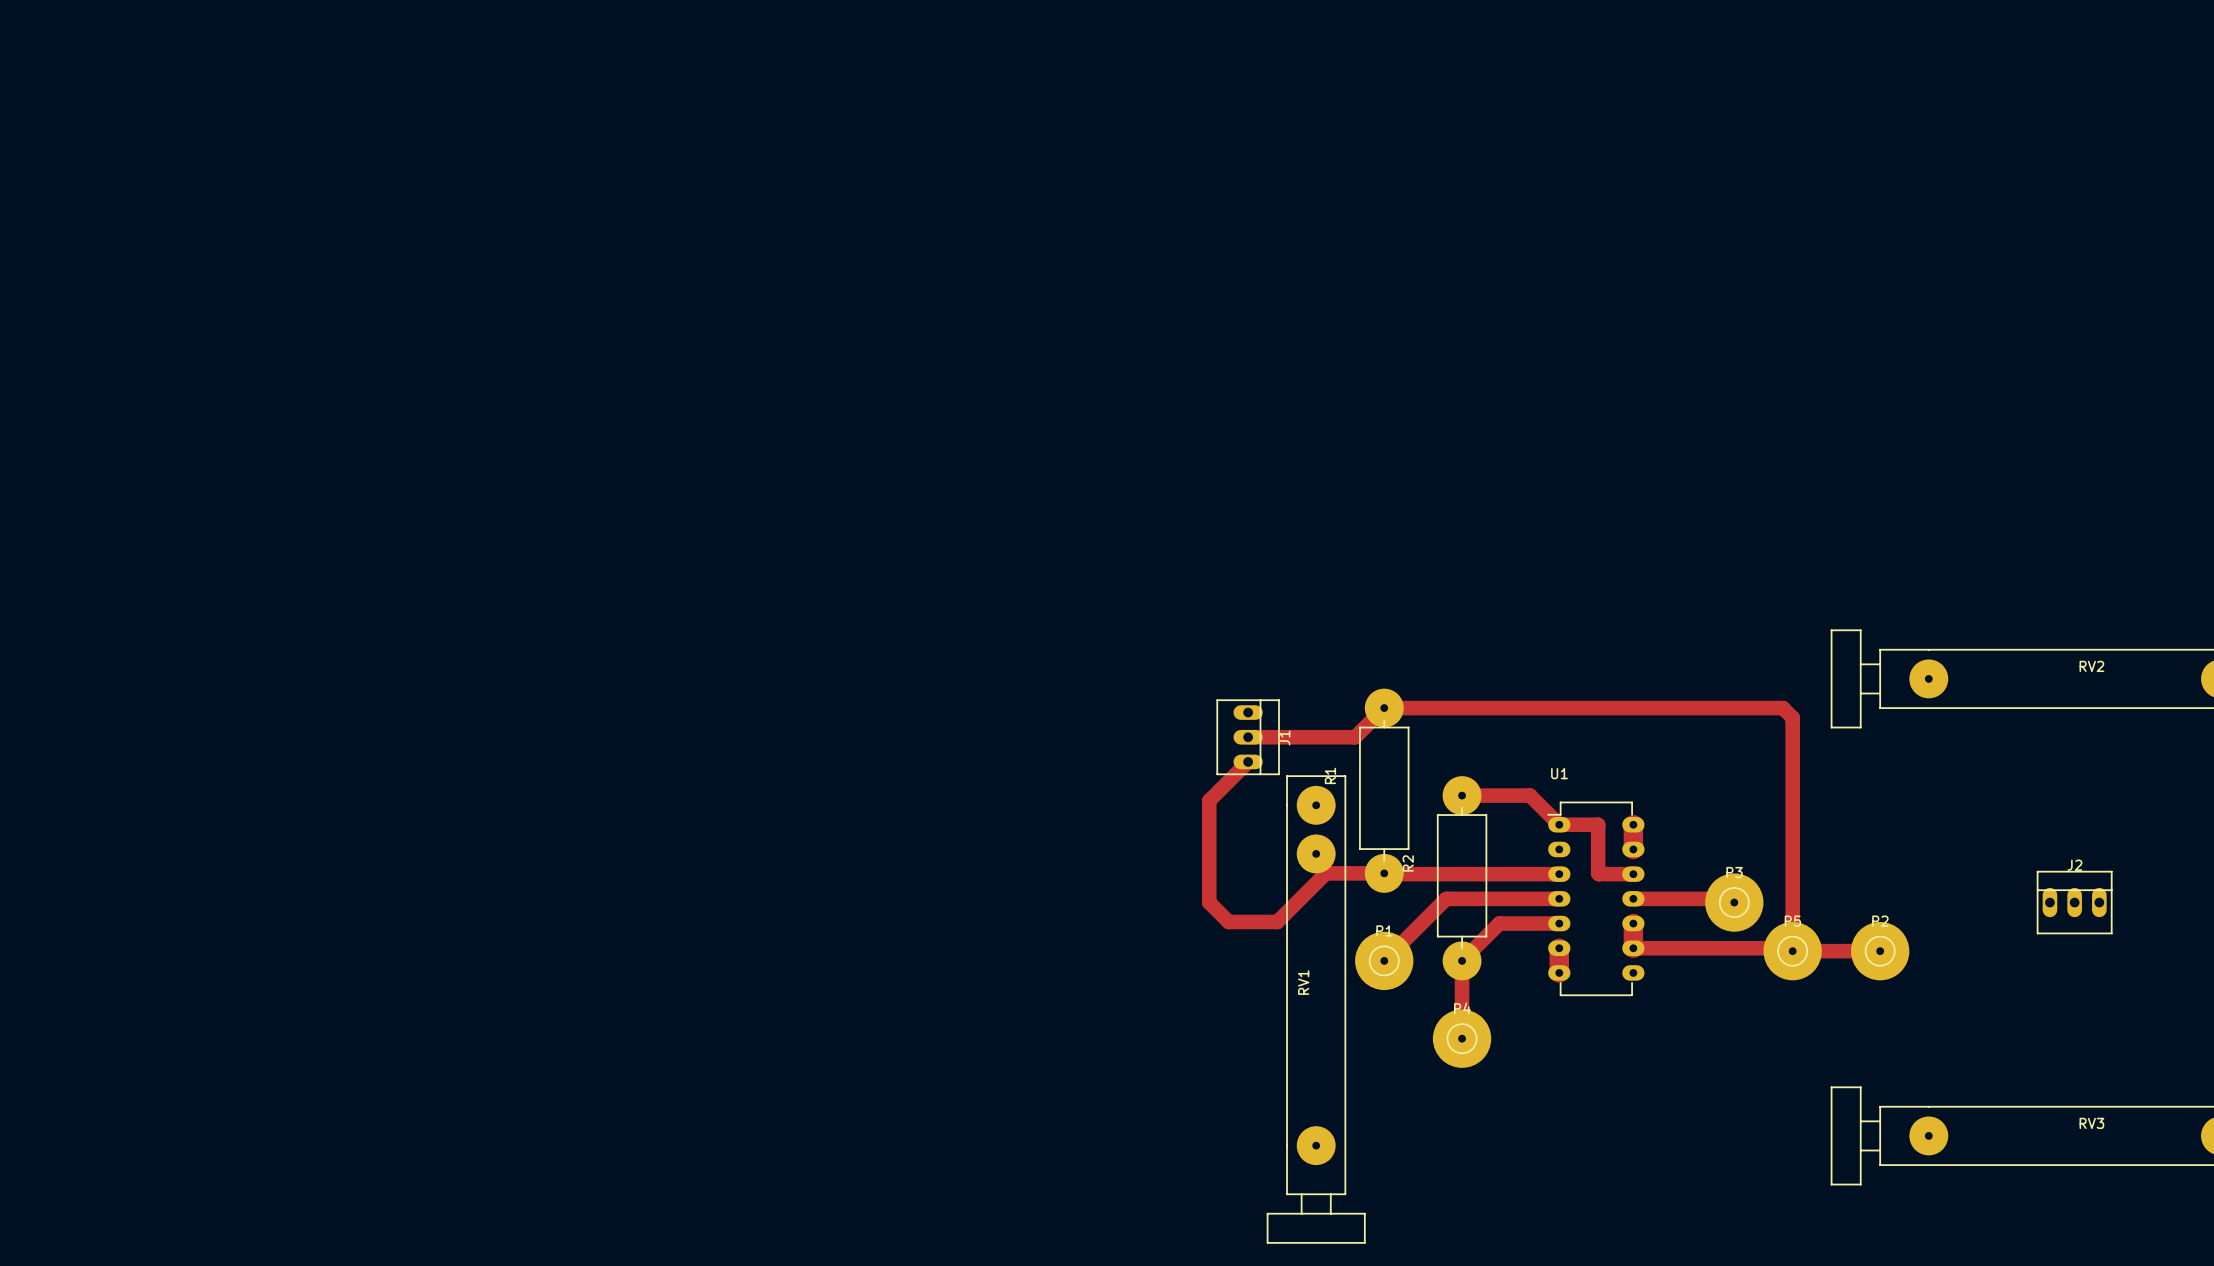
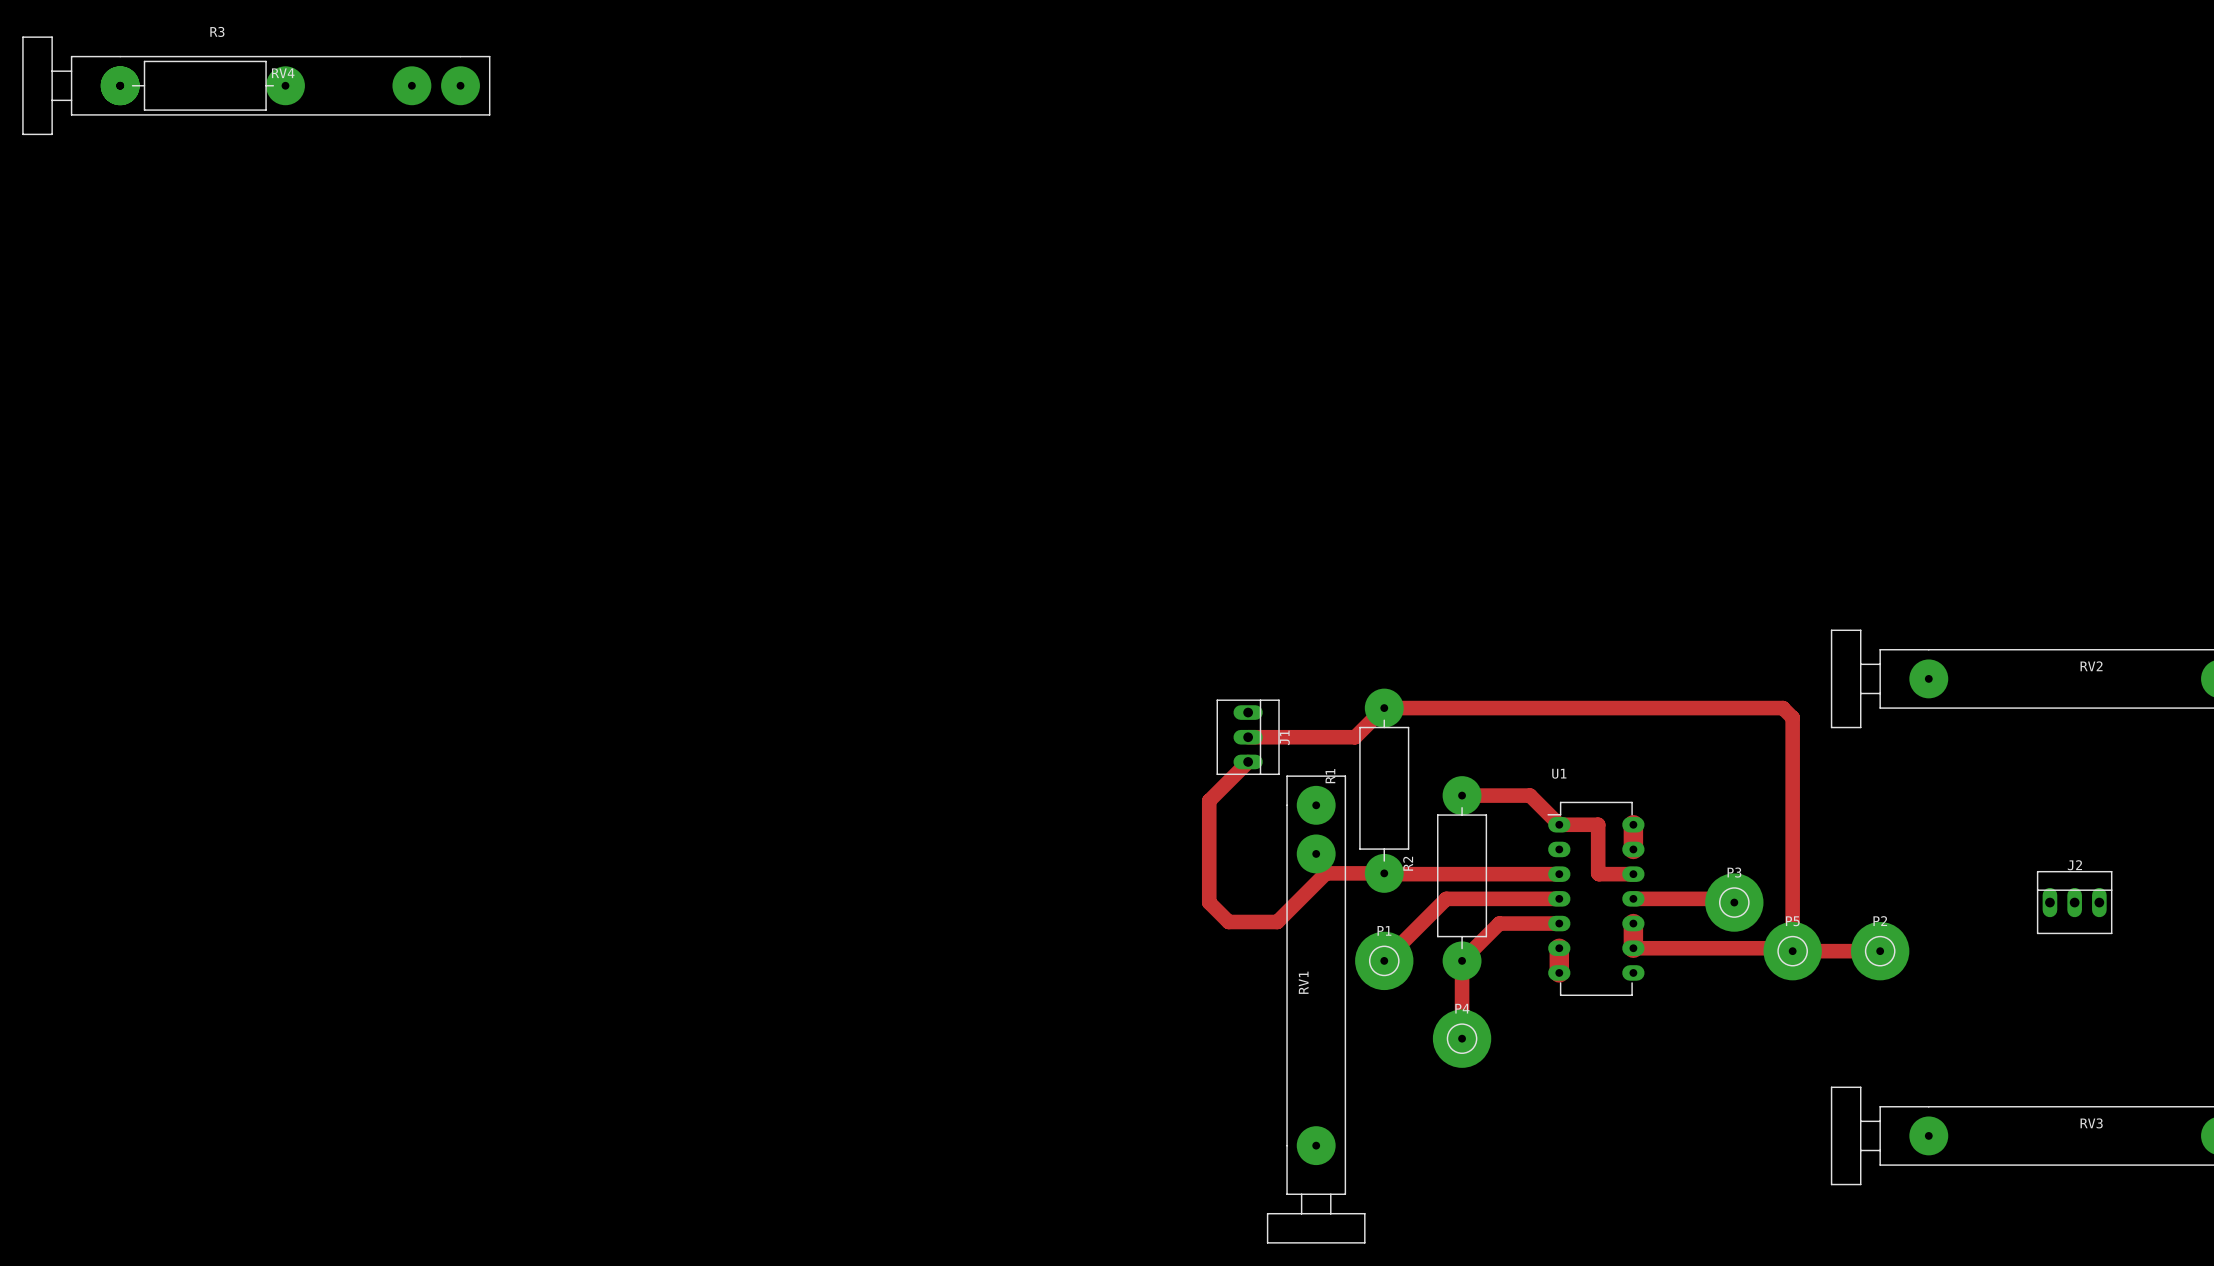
R3: none -> (202, 85)
RV4: none -> (256, 85)

